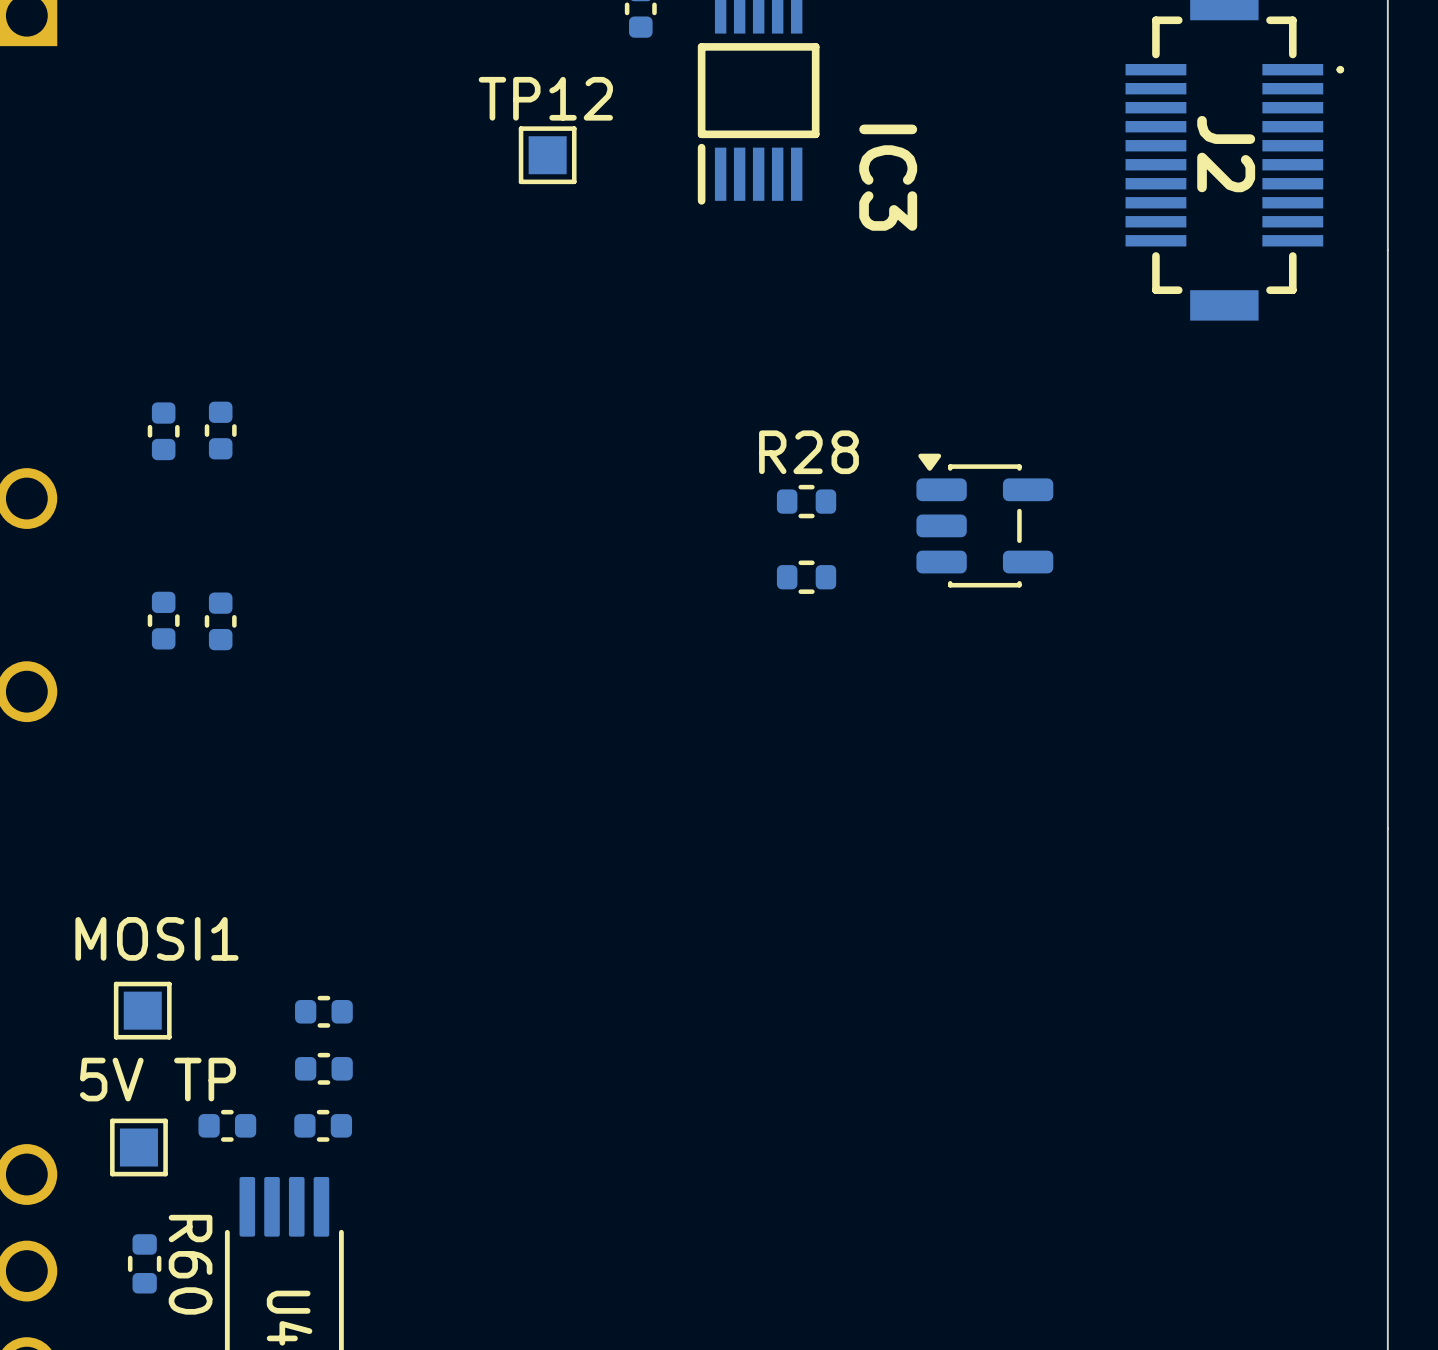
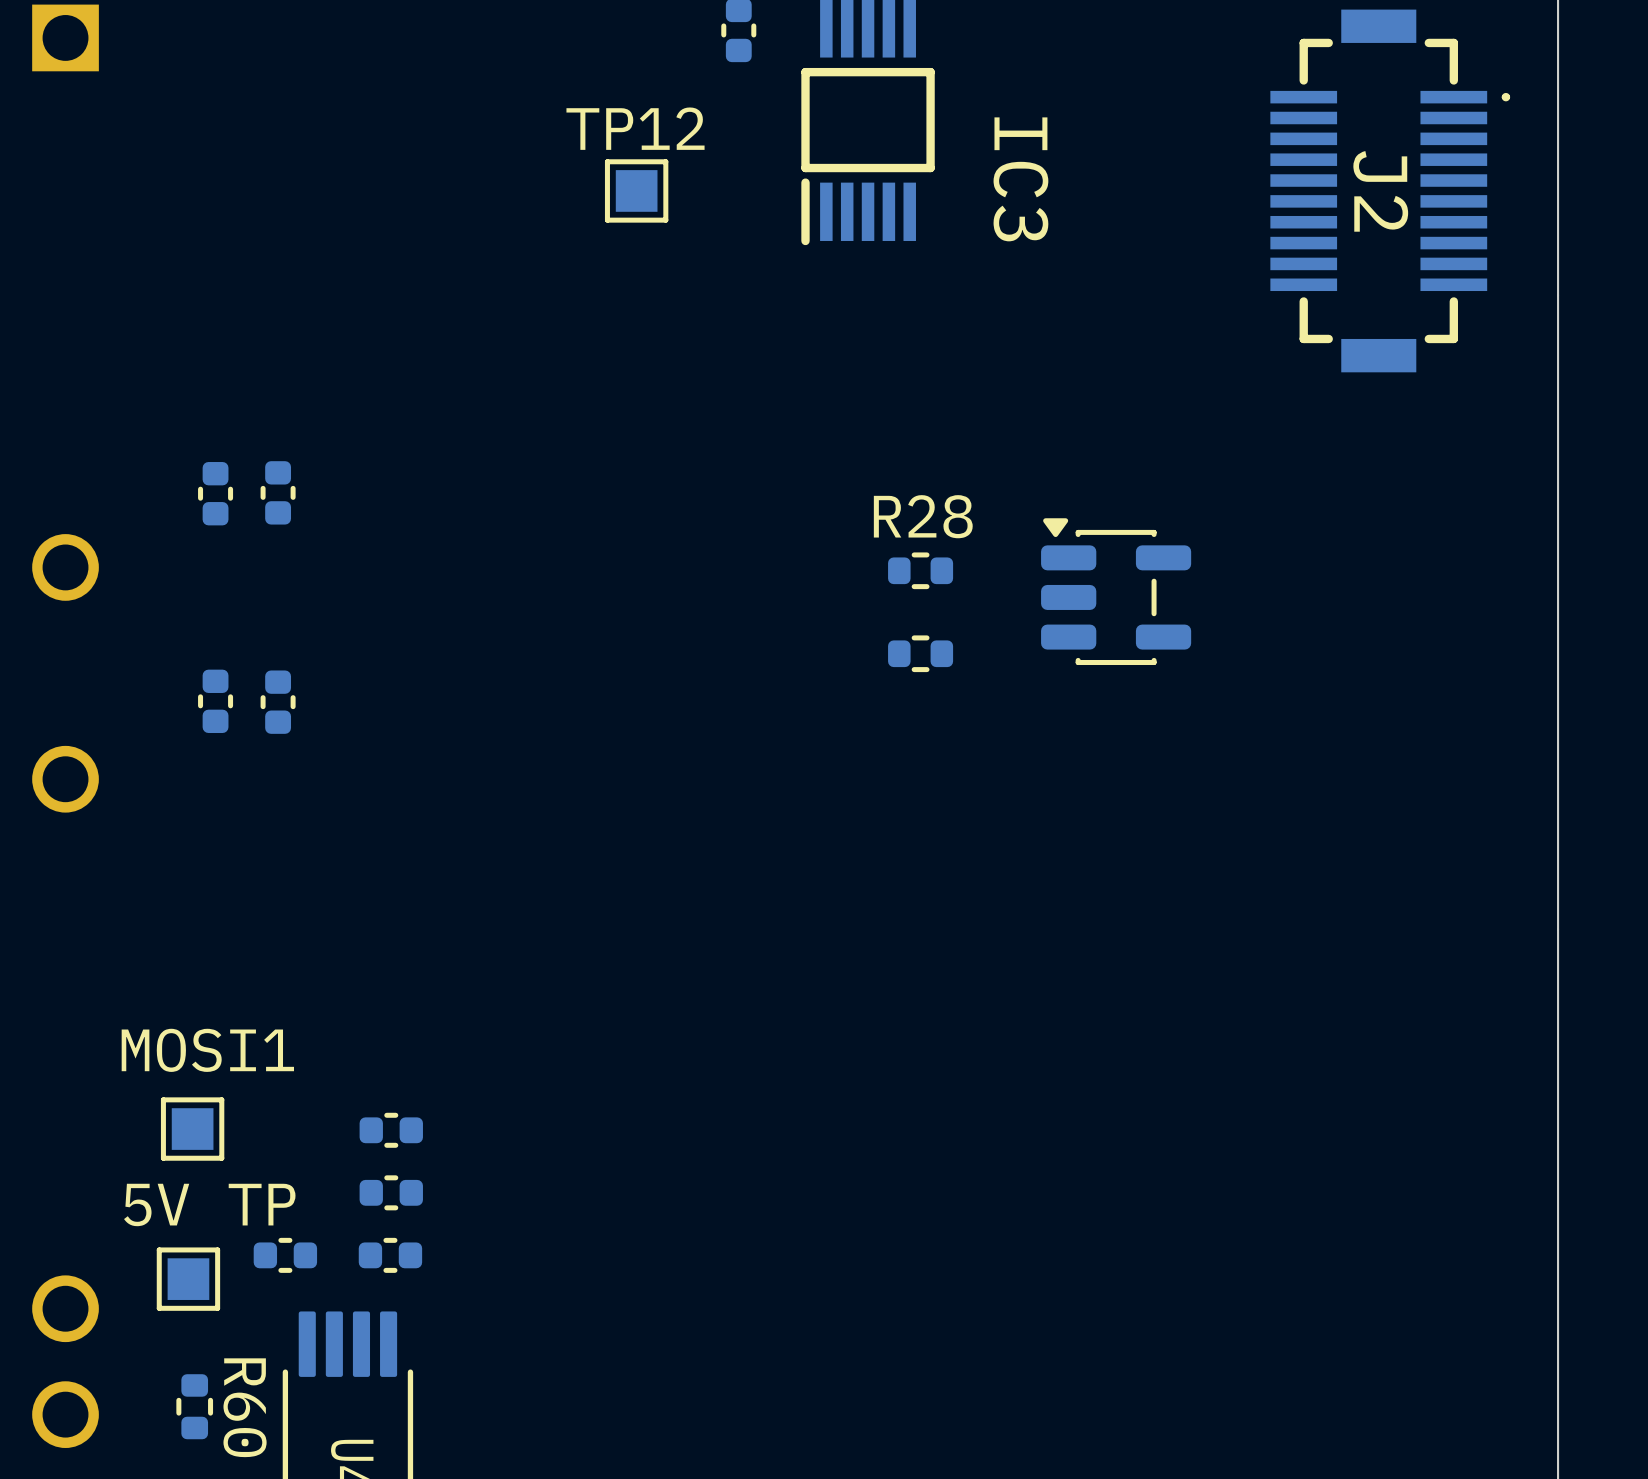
IC3 name position: IC3 (888, 177) -> IC3 (1020, 179)

